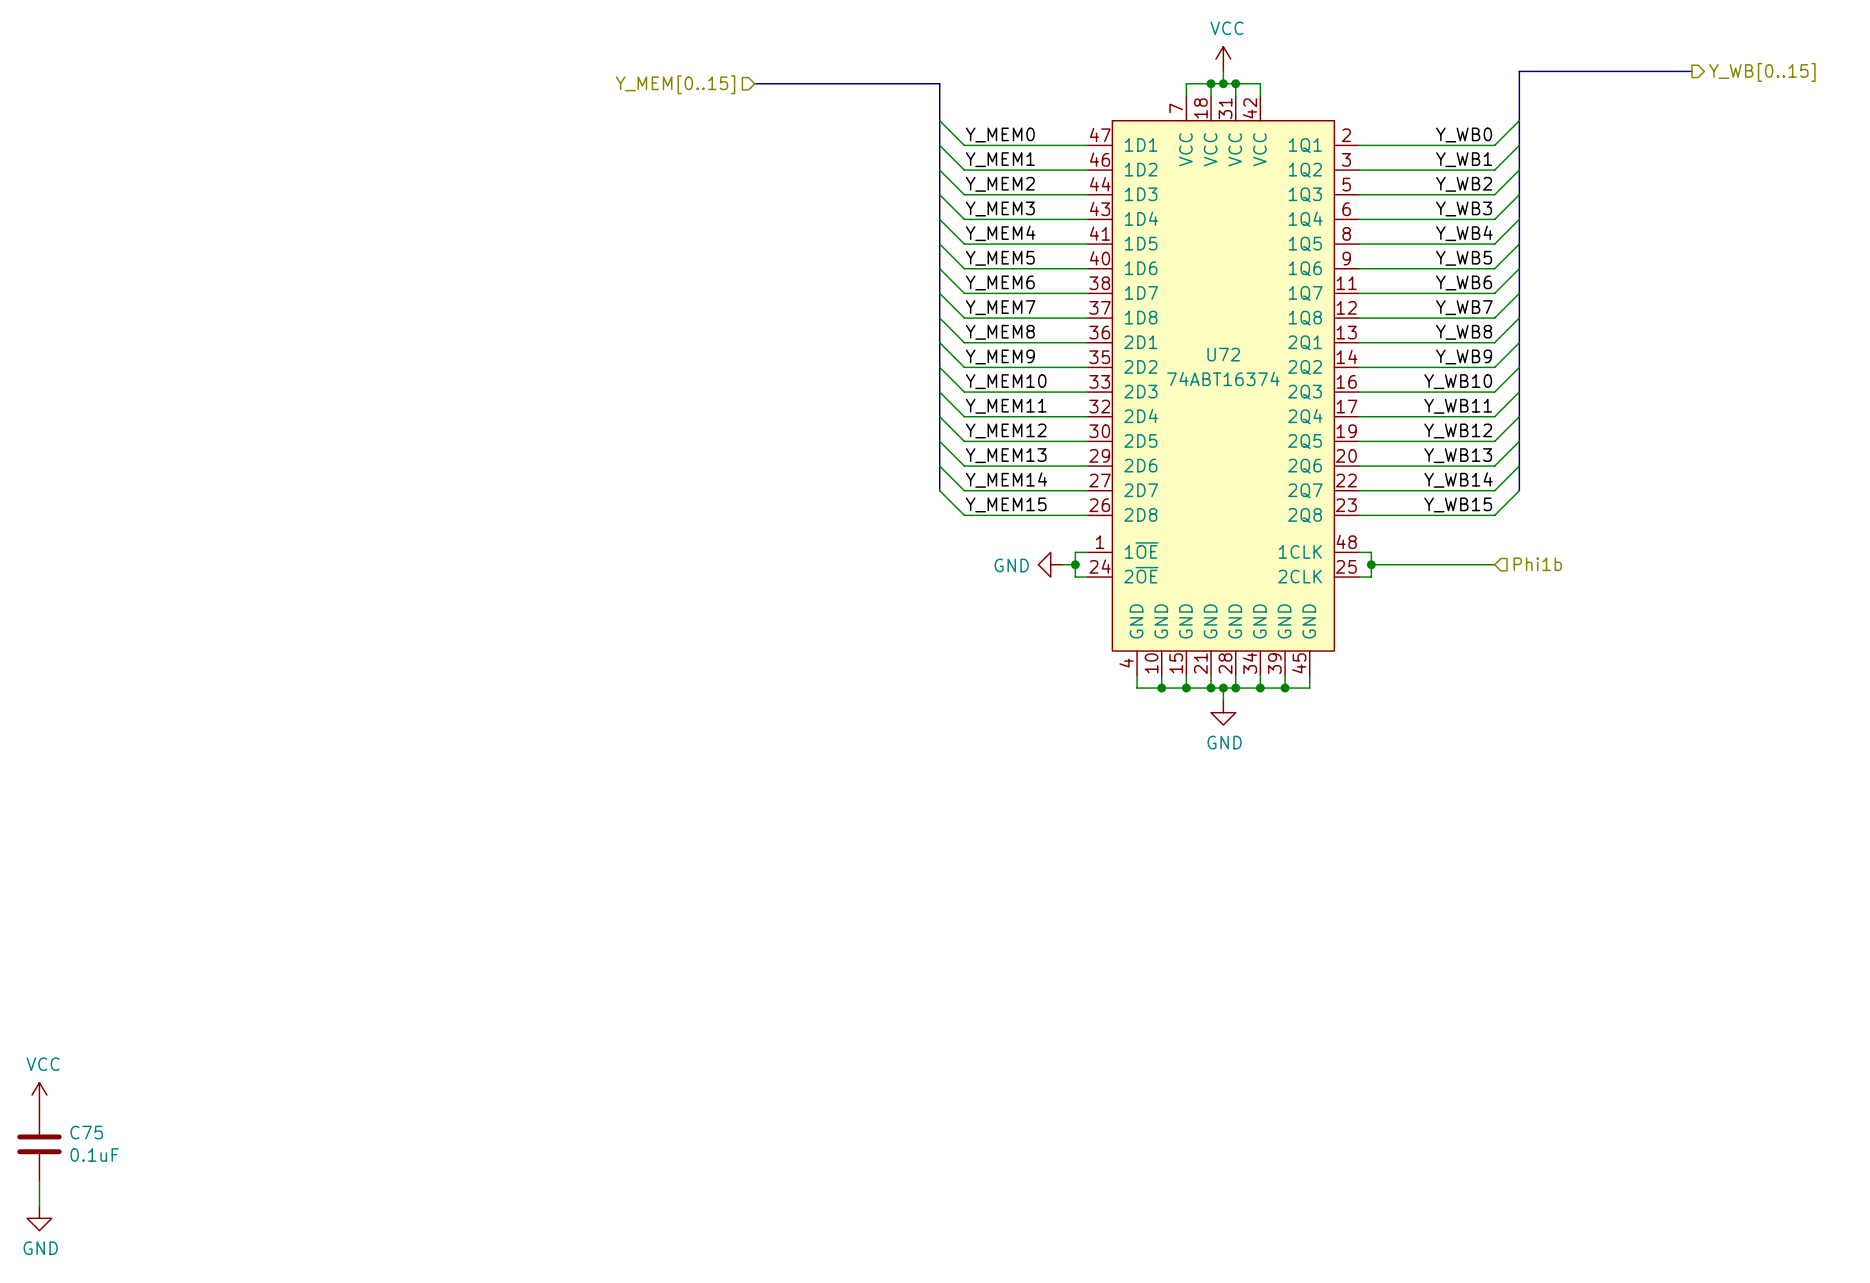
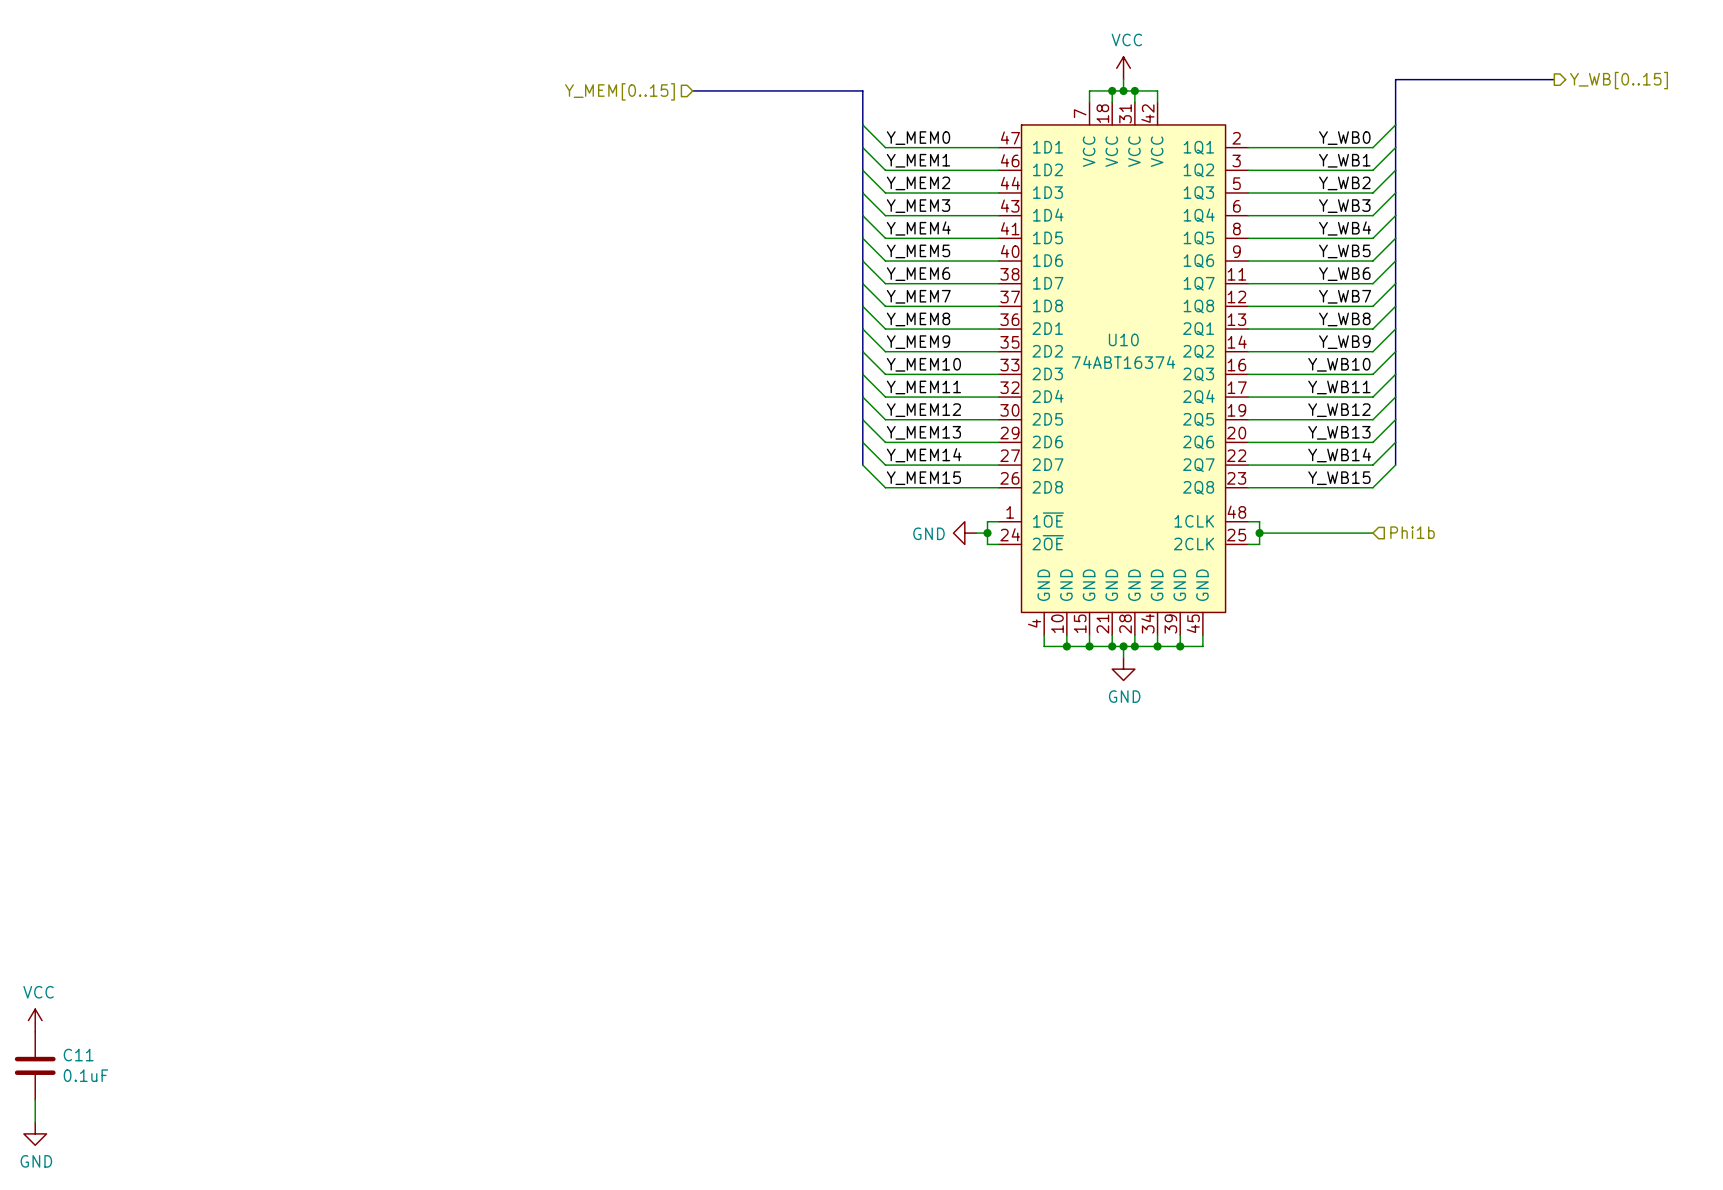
U72 name: U72 (1223, 354) -> U10 (1123, 339)
C75 name: C75 (86, 1132) -> C11 (78, 1055)

